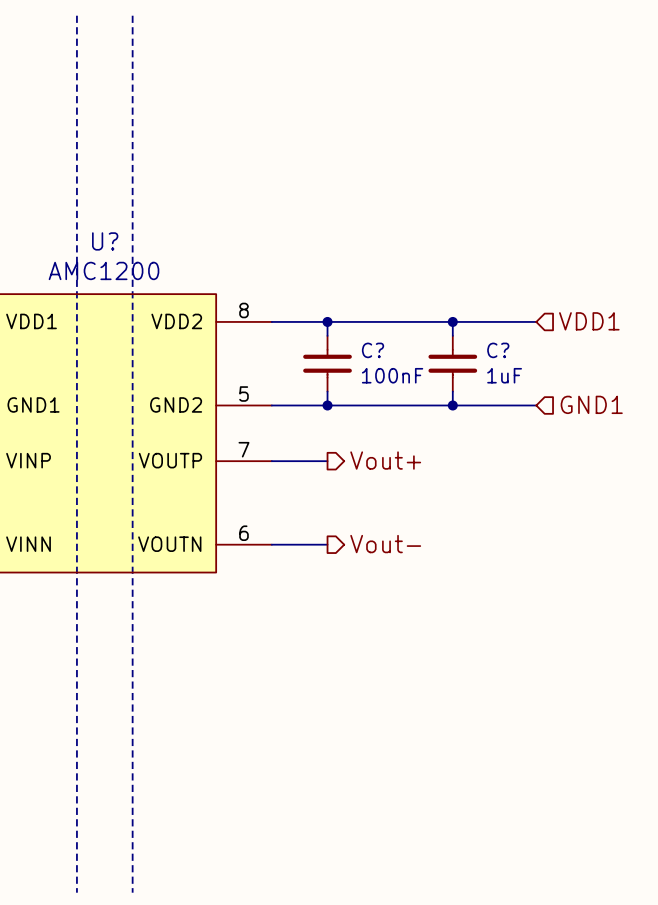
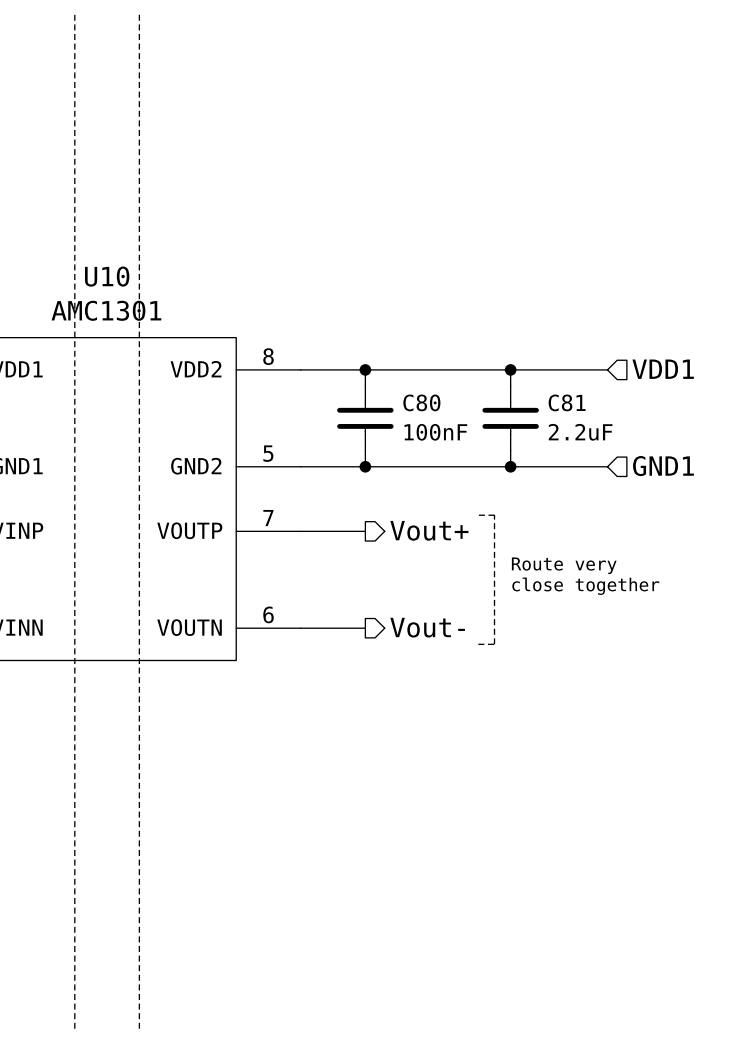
U? name: U? (105, 241) -> U10 (107, 276)
U? value: AMC1200 (104, 270) -> AMC1301 (106, 310)
C? name: C? (373, 350) -> C80 (421, 402)
C? name: C? (498, 350) -> C81 (567, 402)
C? value: 1uF (504, 375) -> 2.2uF (580, 432)
line: none -> (478, 515) (494, 515) (494, 644) (478, 644)
text: none -> Route very (564, 565)
text: none -> close together (585, 586)

